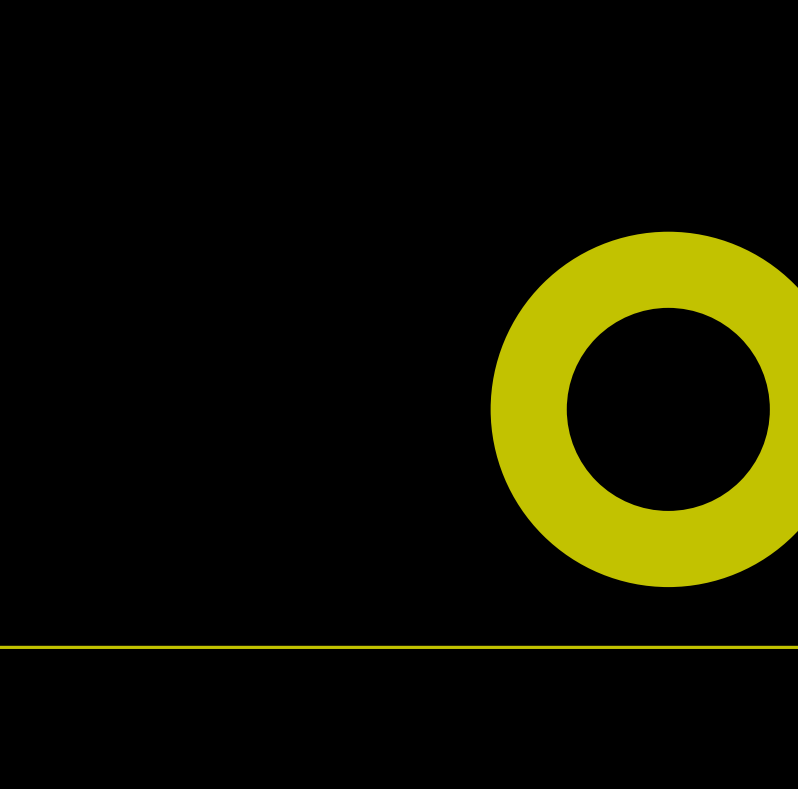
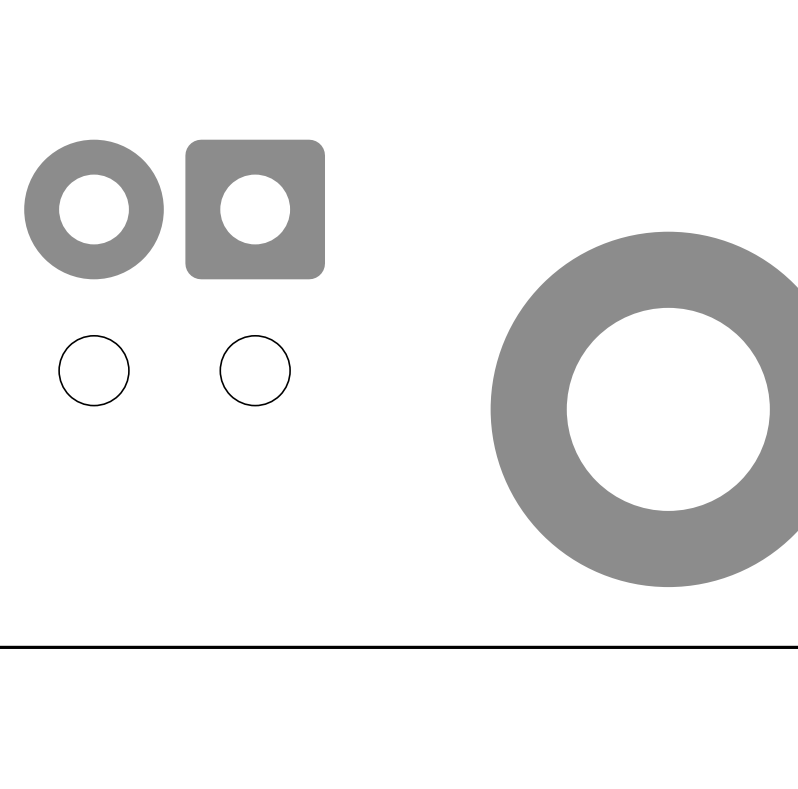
part: none -> (174, 272)

